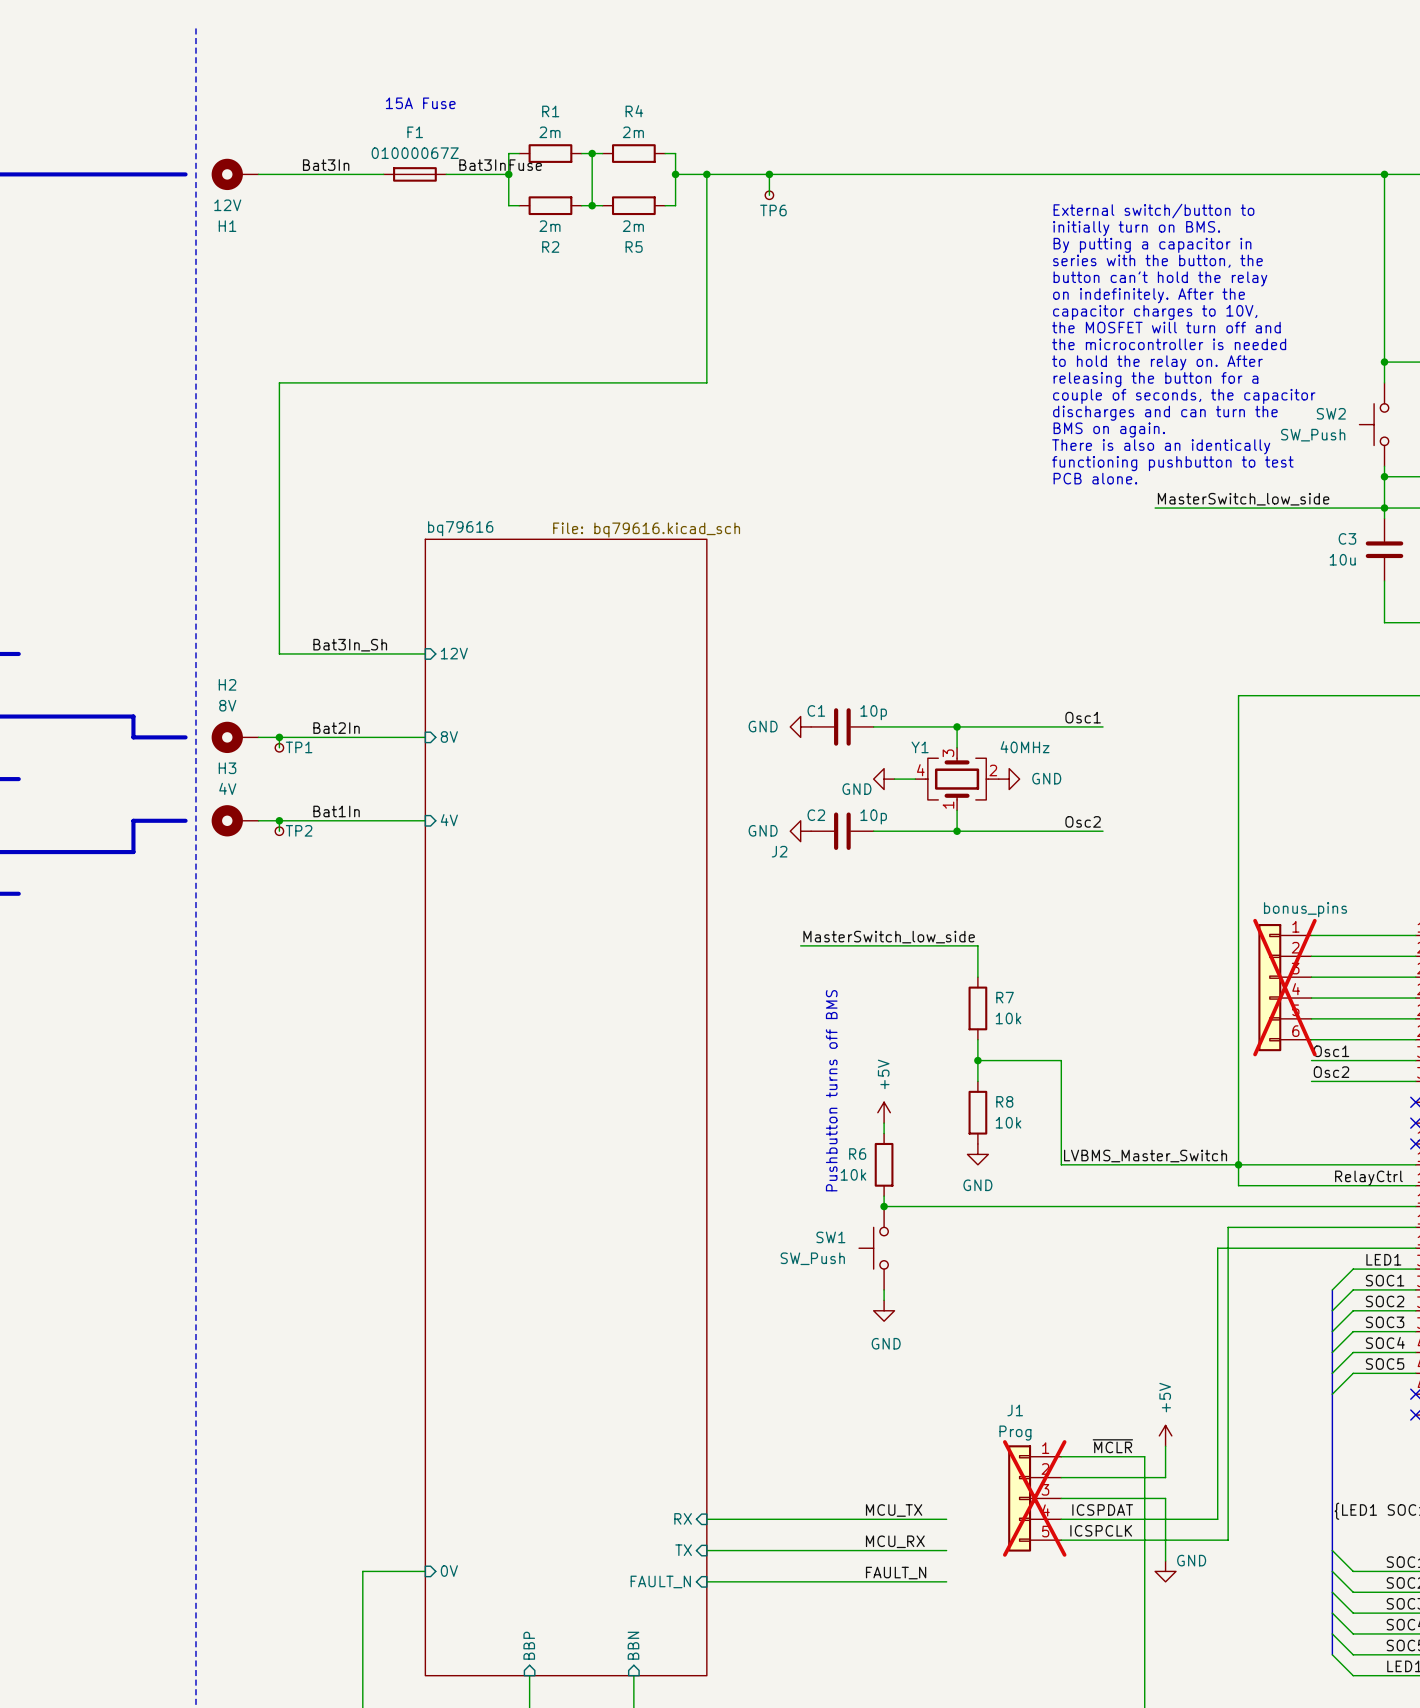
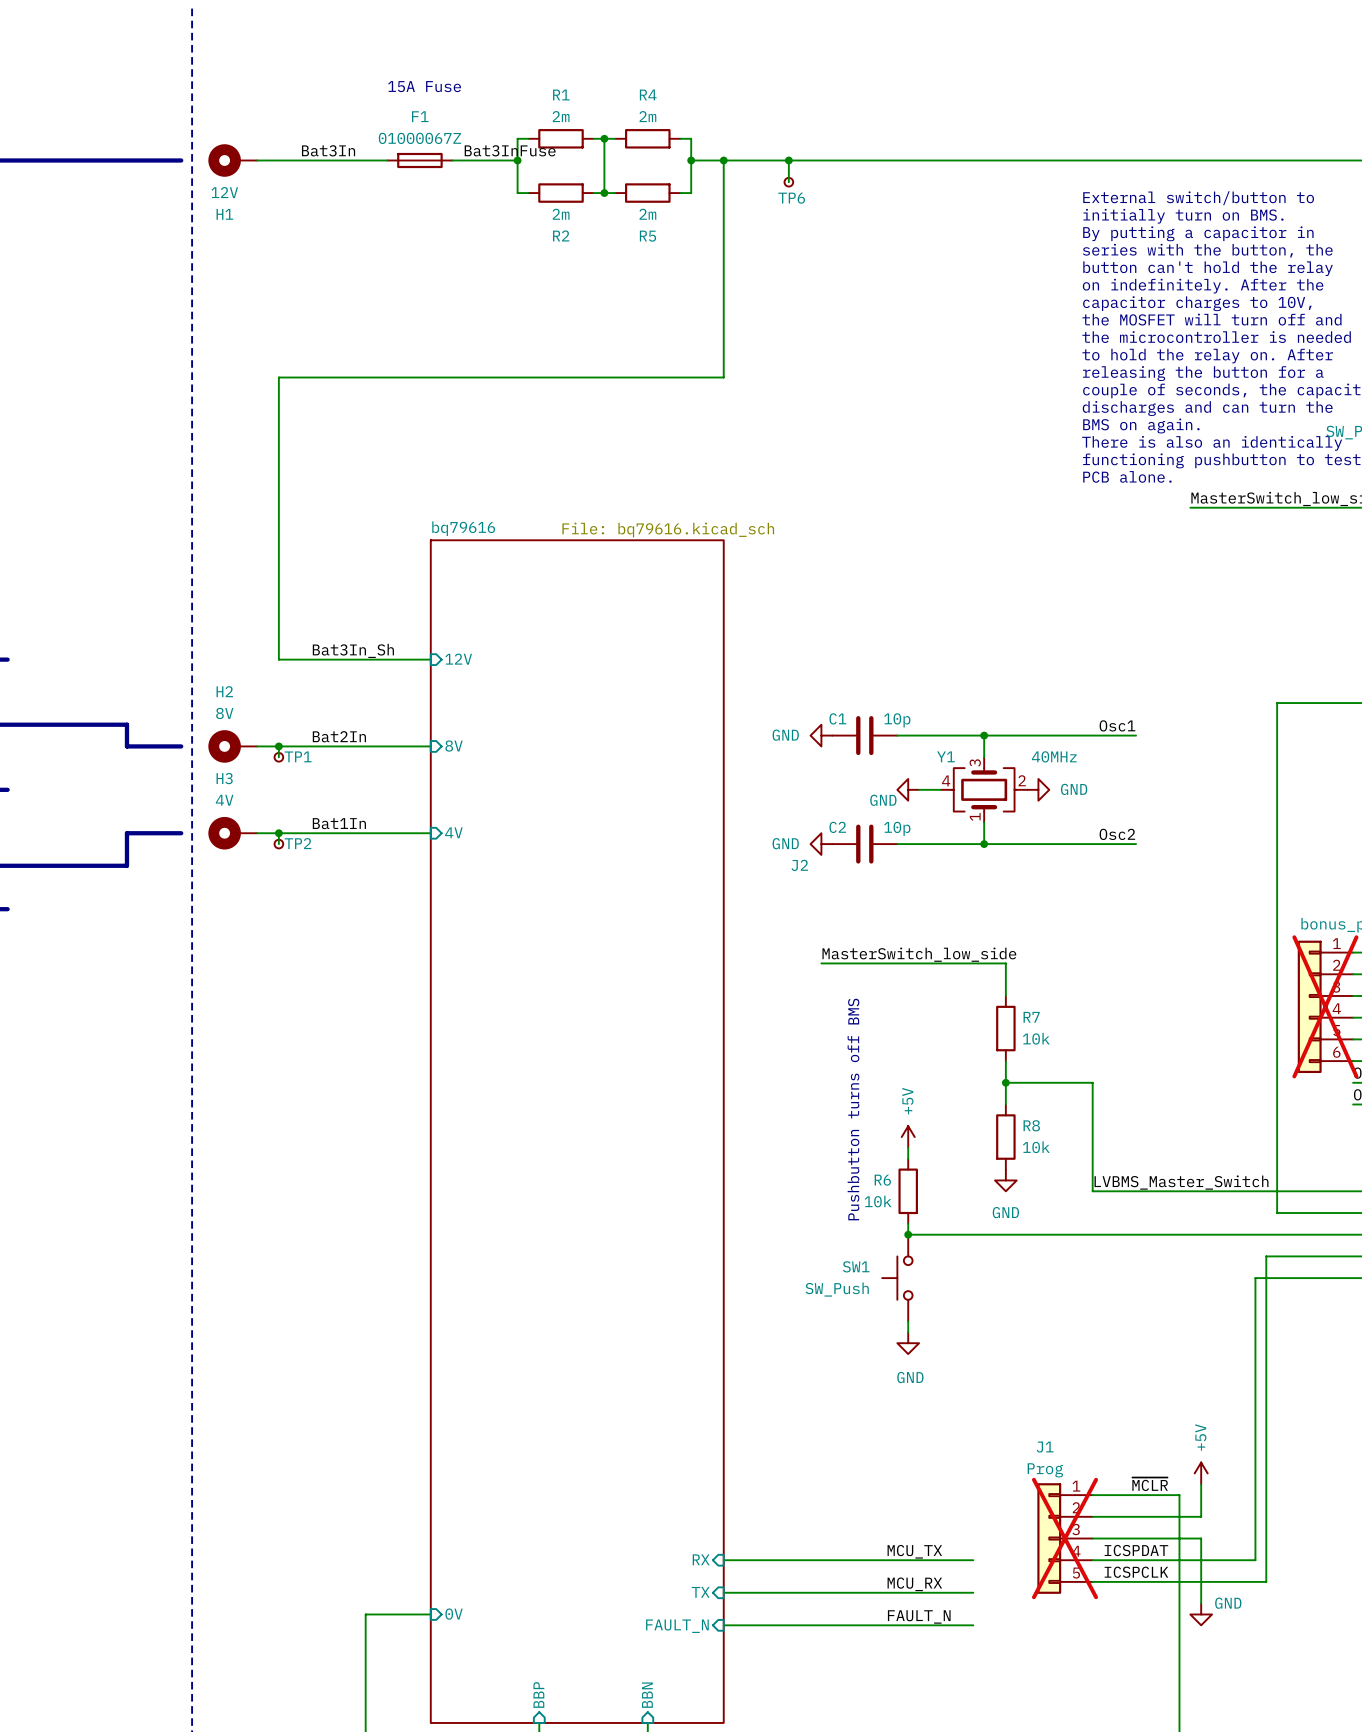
junction: (1238, 1164) -> none

